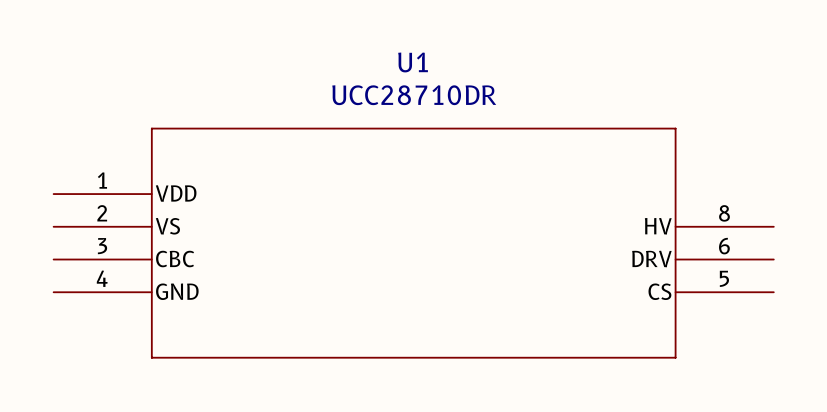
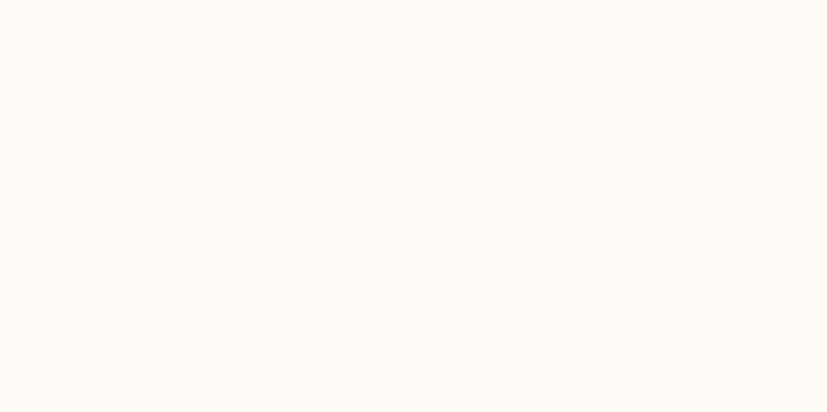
U1: UCC28710DR (413, 243) -> none

